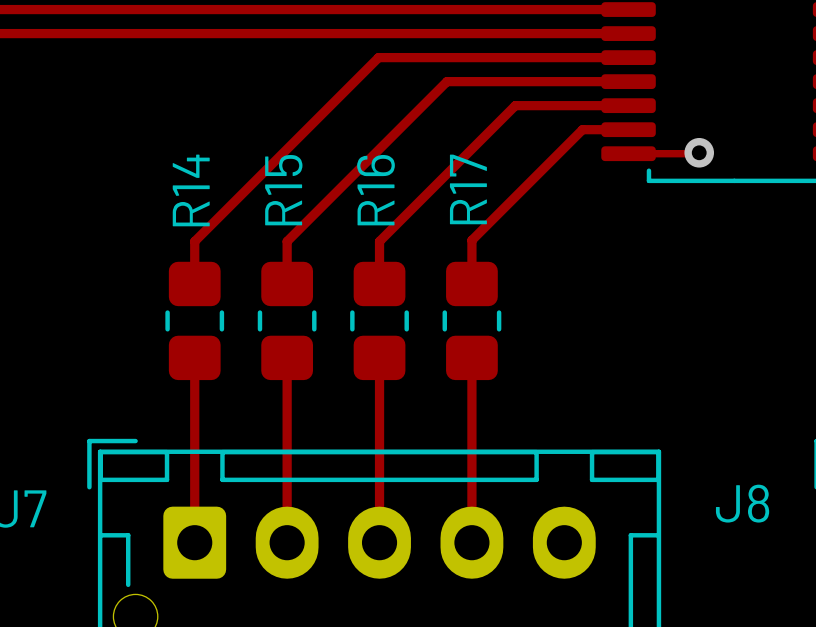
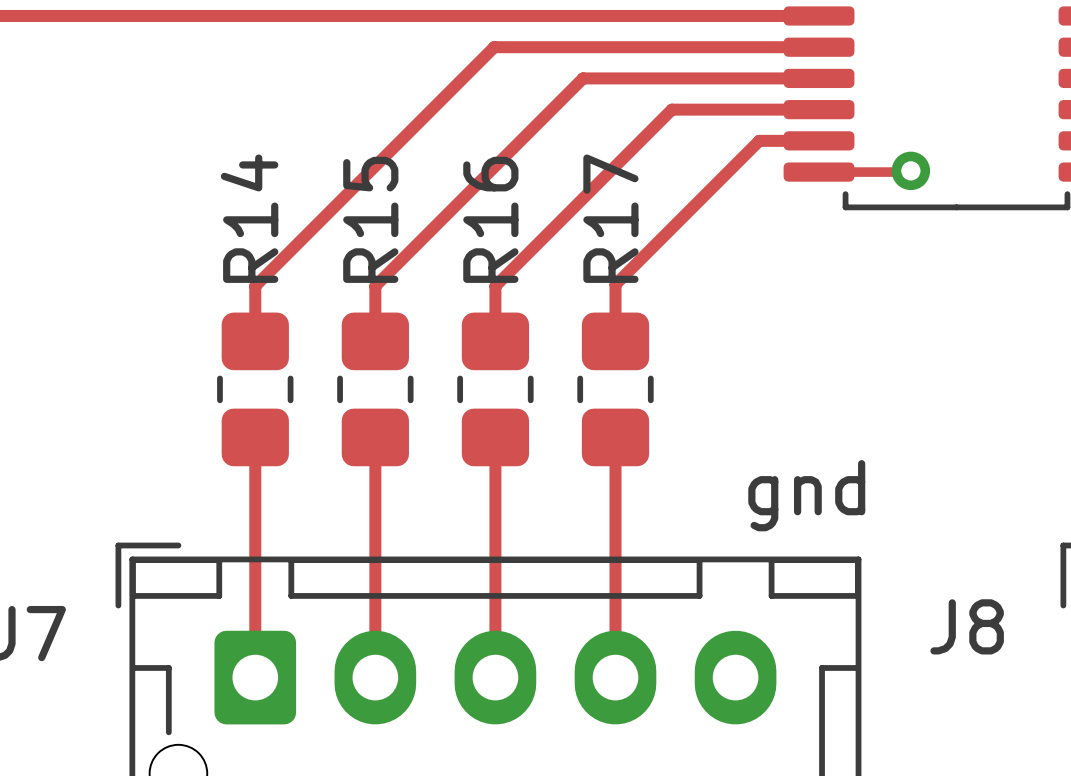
text: none -> gnd (806, 495)

